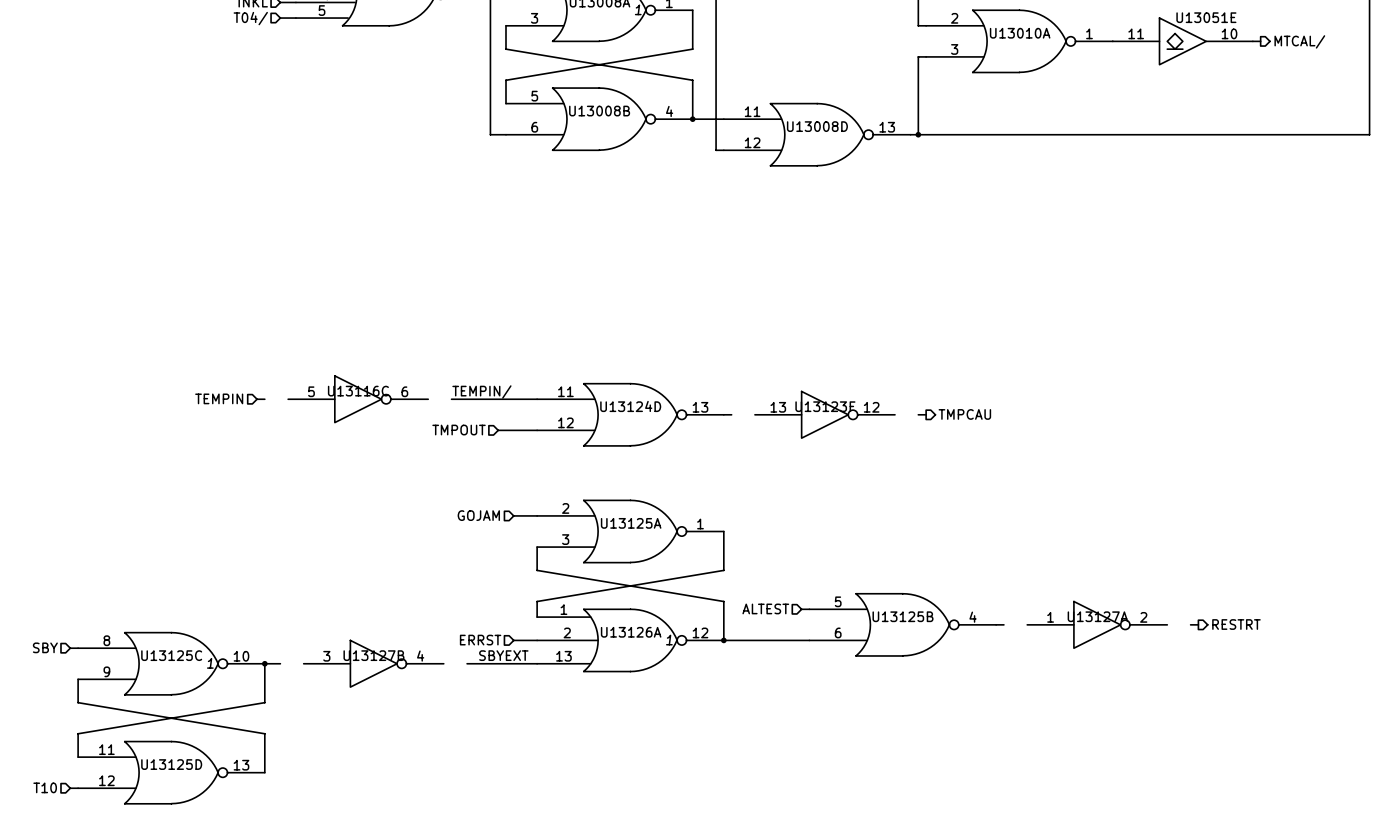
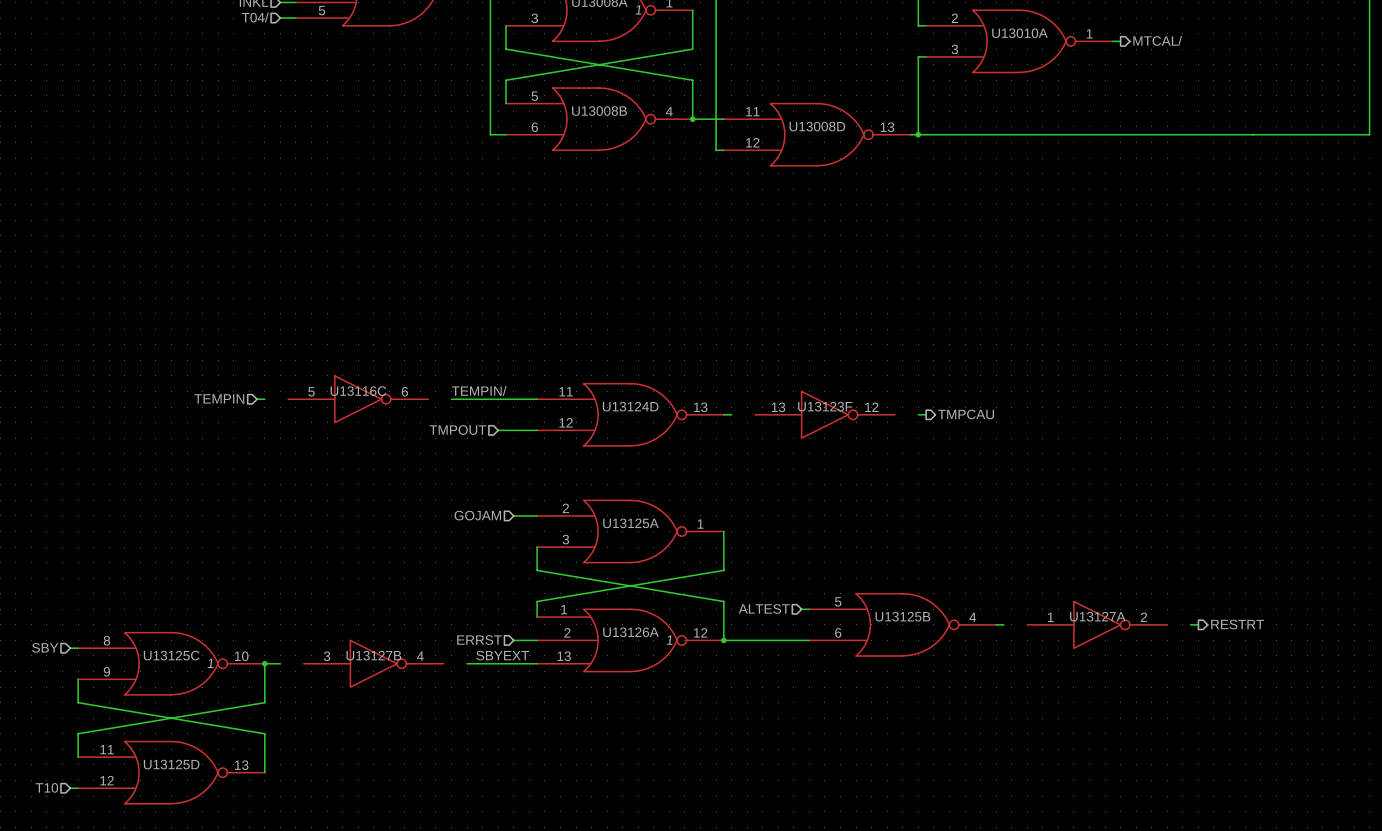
U13051E: (1182, 41) -> none
hierarchical label position: MTCAL/ (1299, 41) -> MTCAL/ (1157, 40)

